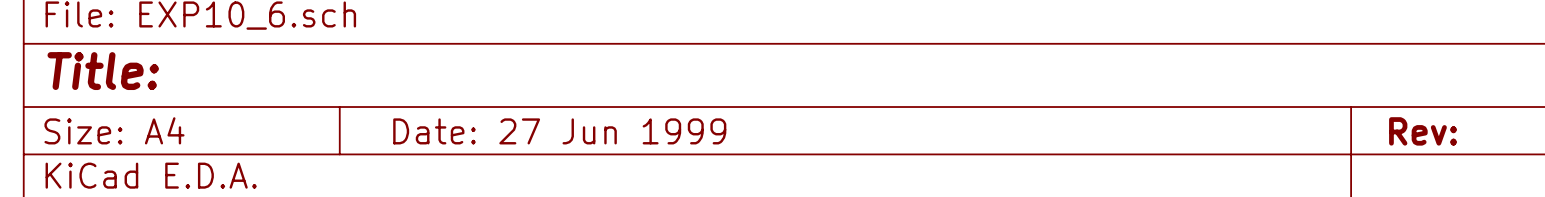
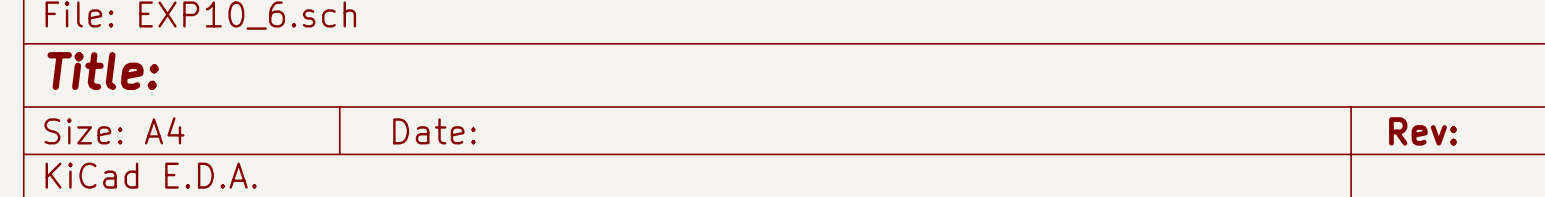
title block: Date: 27 Jun 1999 (559, 131) -> Date: (434, 131)

